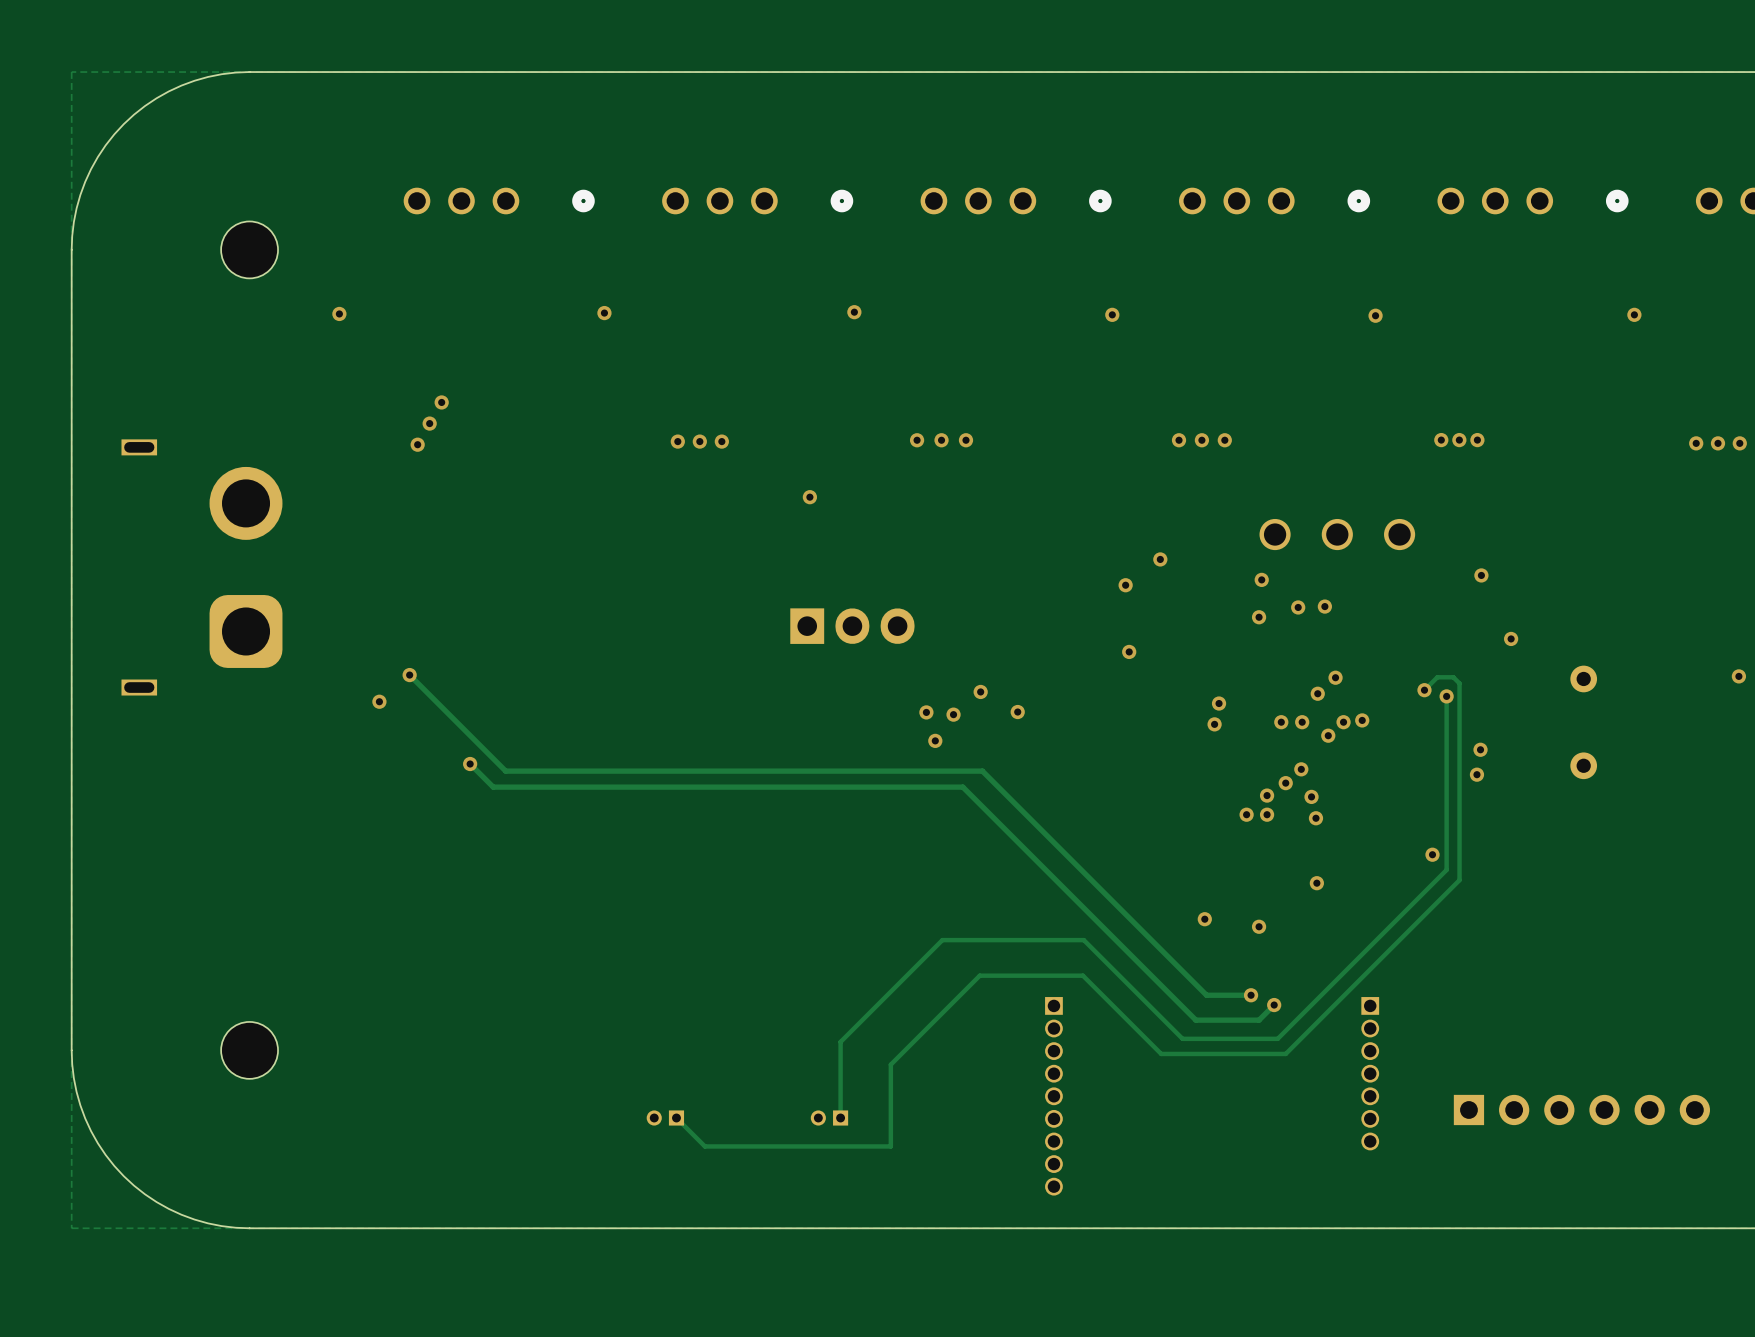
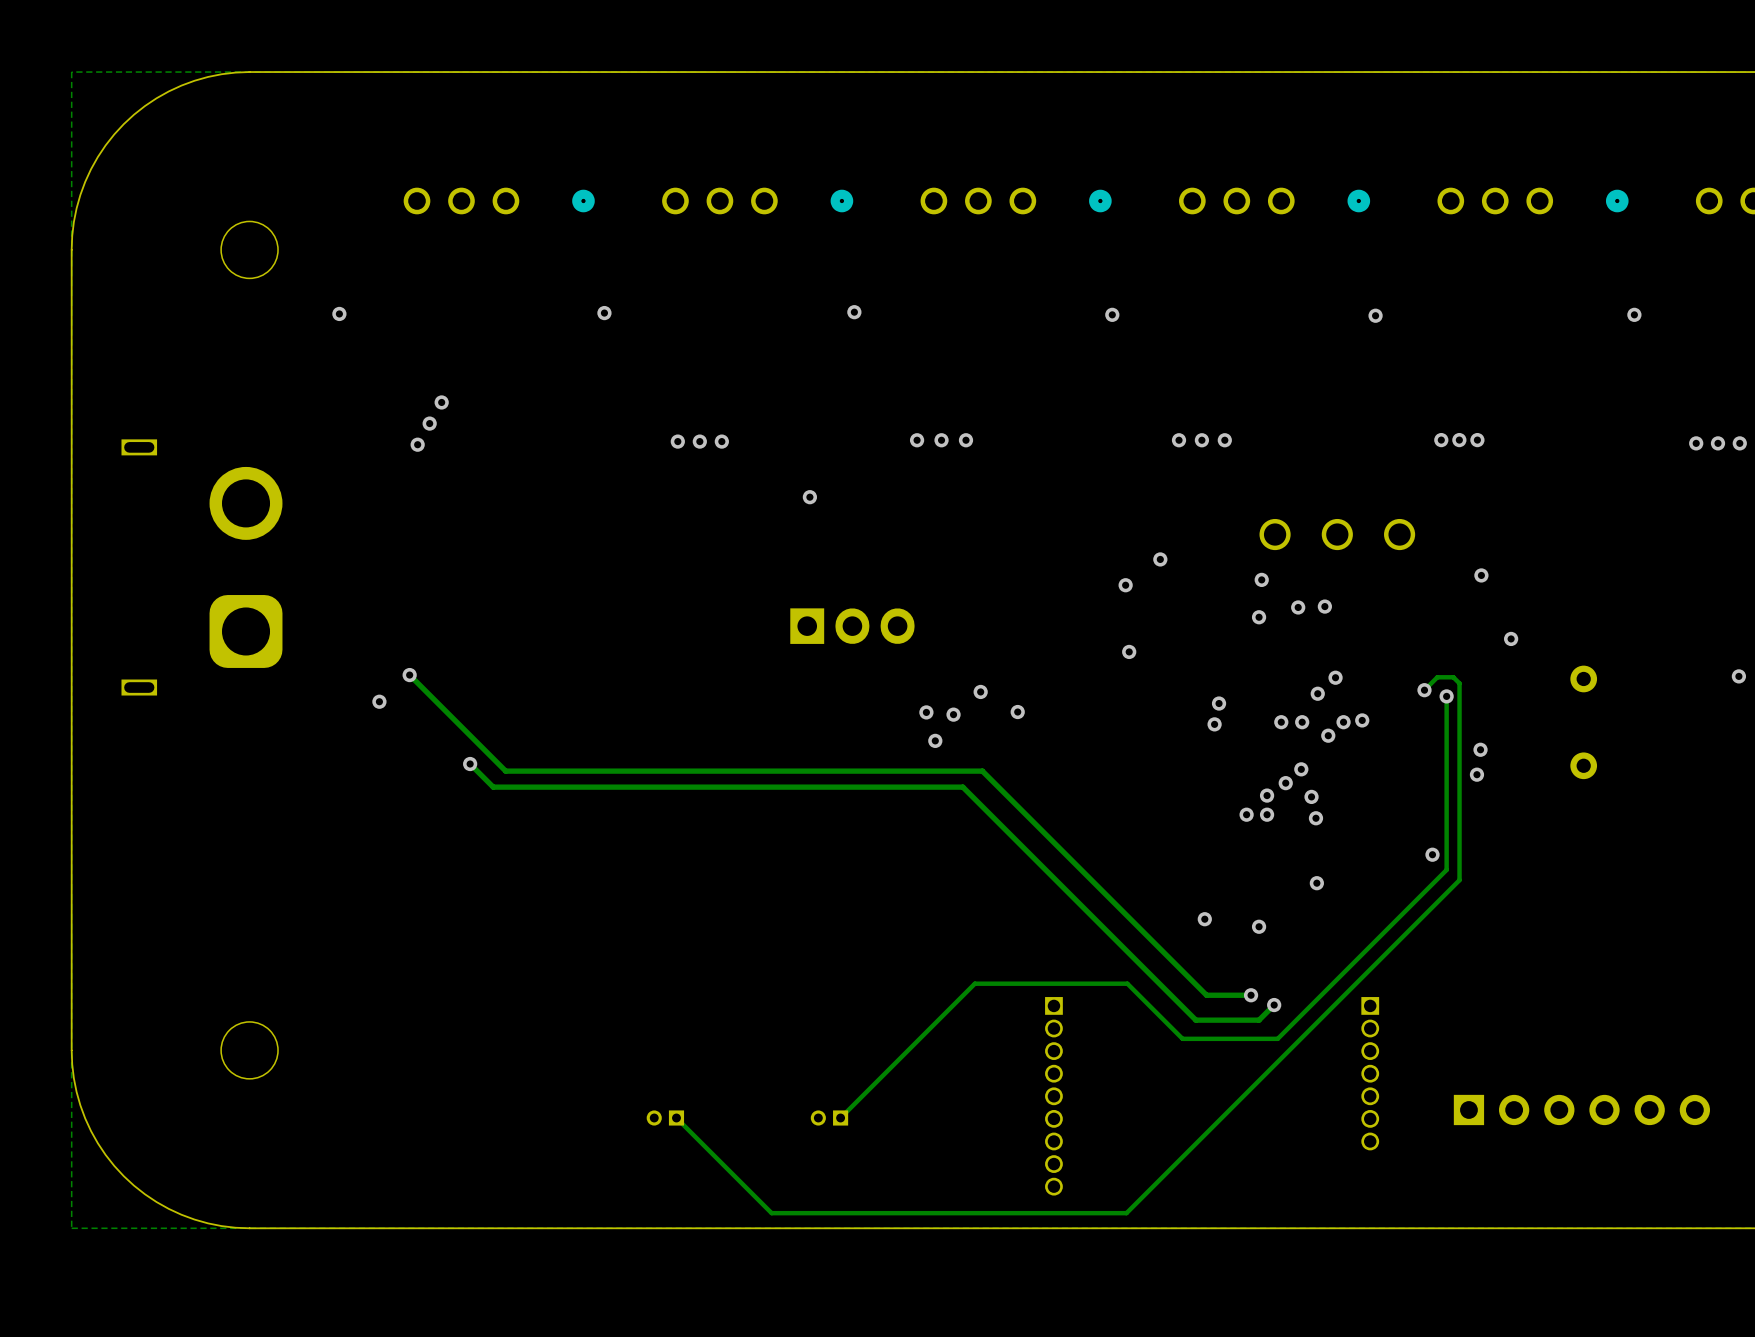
track: (1127, 983) (1083, 940) (942, 940) (840, 1041) (840, 1117) -> (1127, 983) (974, 983) (840, 1117)
track: (1285, 1053) (1161, 1053) (1082, 975) (979, 975) (890, 1064) (890, 1146) (704, 1146) -> (1285, 1053) (1126, 1213) (771, 1213) (704, 1146)

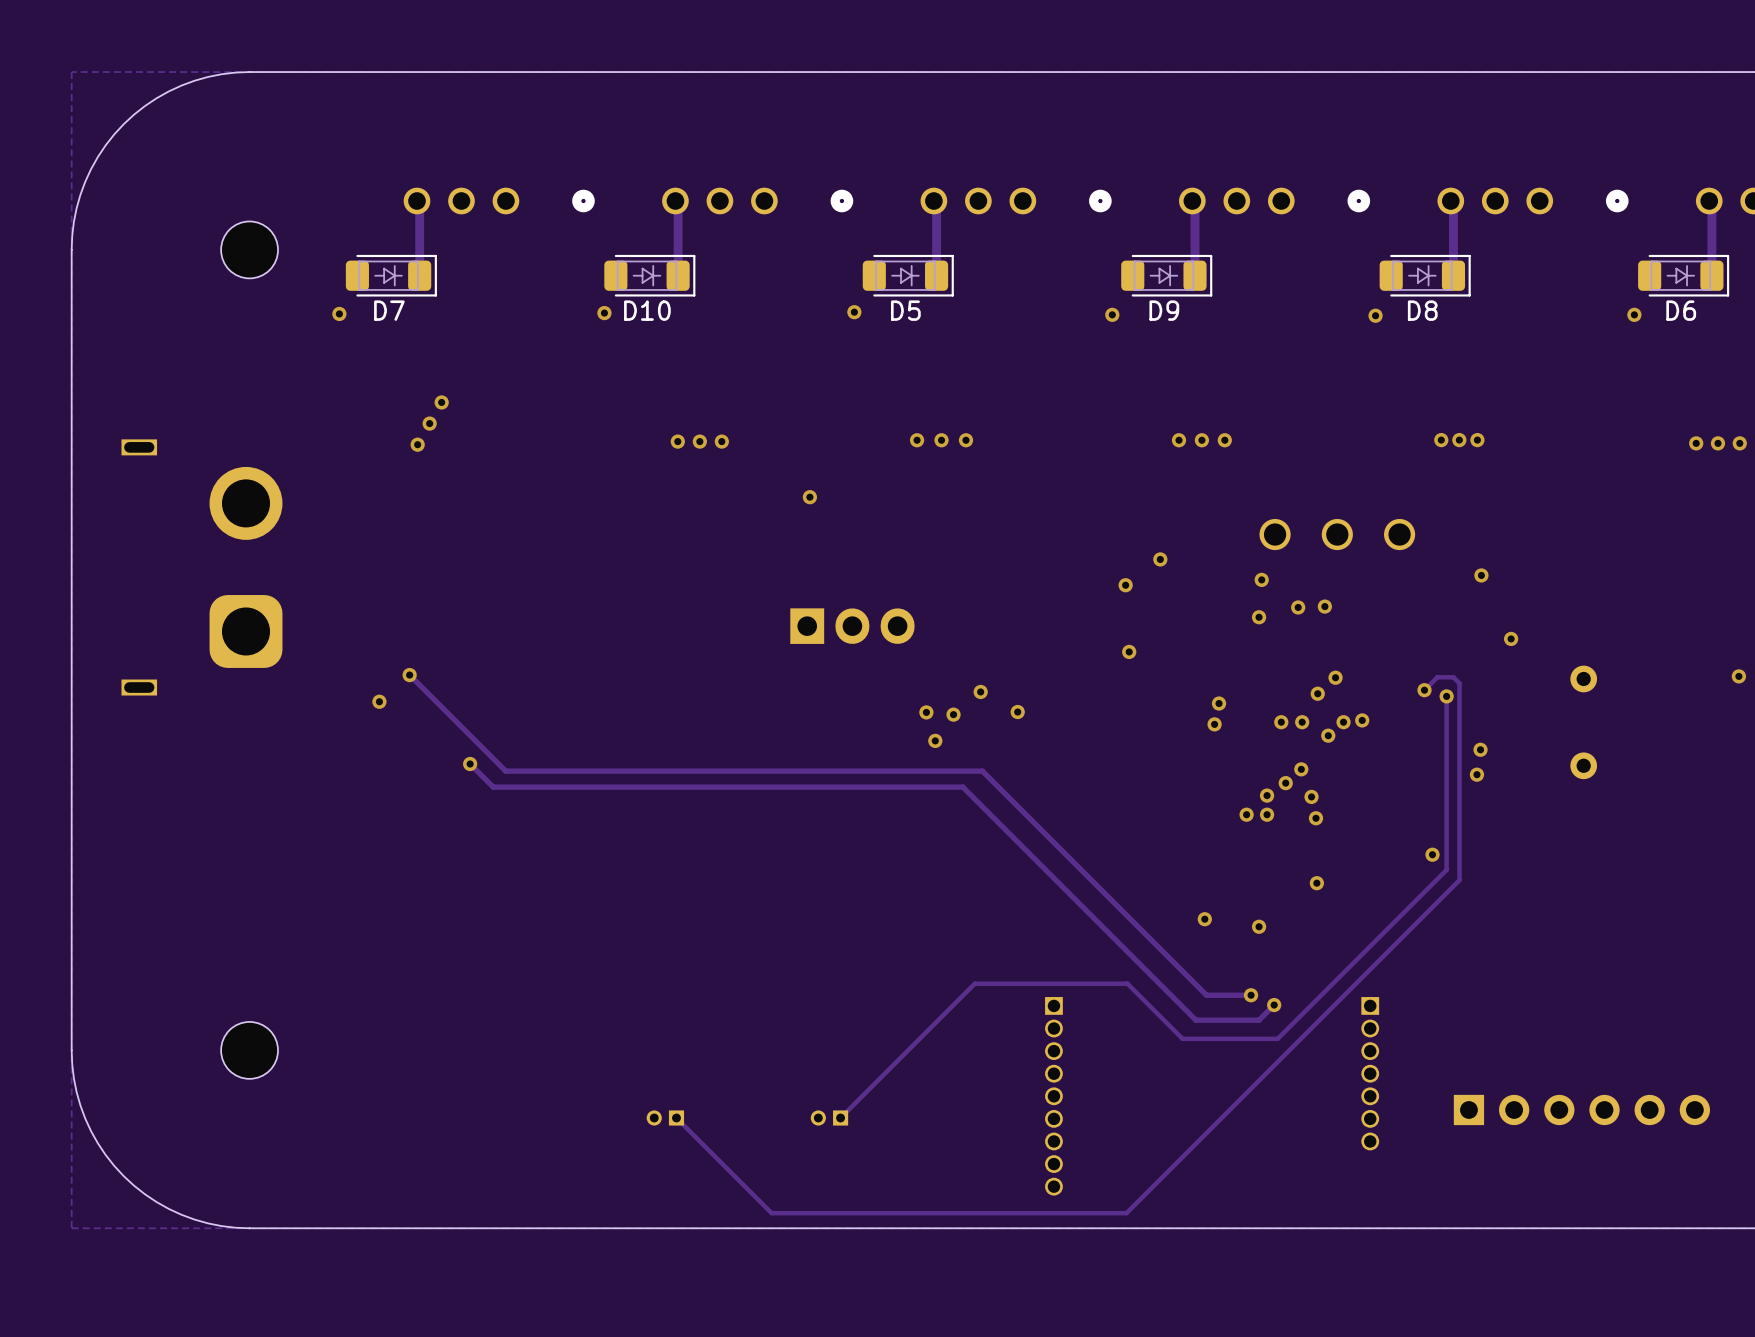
track: none -> (417, 201) (419, 203) (419, 275)
track: none -> (675, 201) (678, 203) (678, 275)
track: none -> (933, 201) (936, 203) (936, 275)
track: none -> (1192, 201) (1195, 203) (1195, 275)
track: none -> (1450, 201) (1453, 203) (1453, 275)
track: none -> (1709, 201) (1711, 203) (1711, 275)
D7: none -> (391, 275)
D10: none -> (649, 275)
D5: none -> (908, 275)
D9: none -> (1166, 275)
D8: none -> (1425, 275)
D6: none -> (1683, 275)

